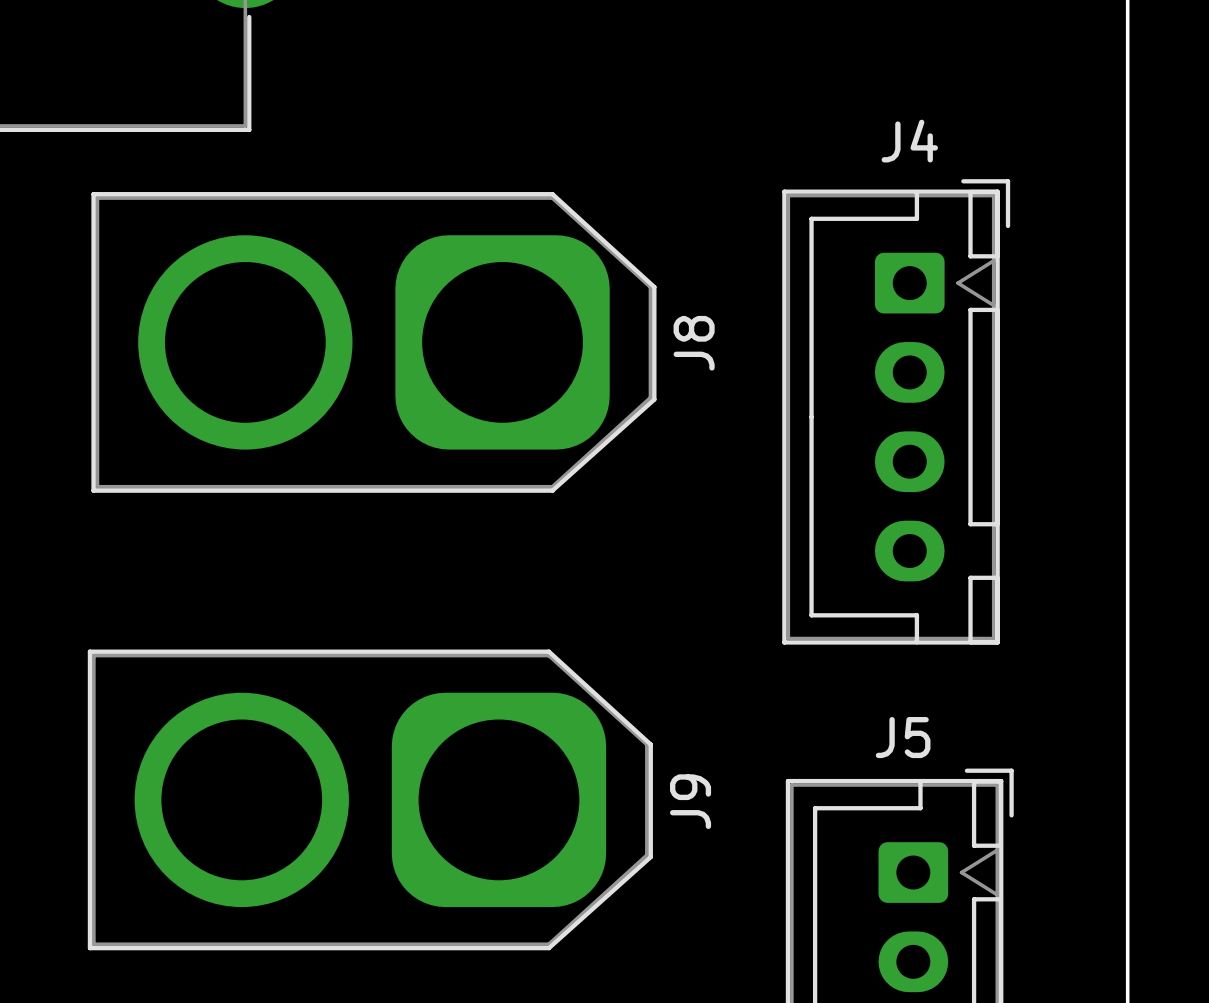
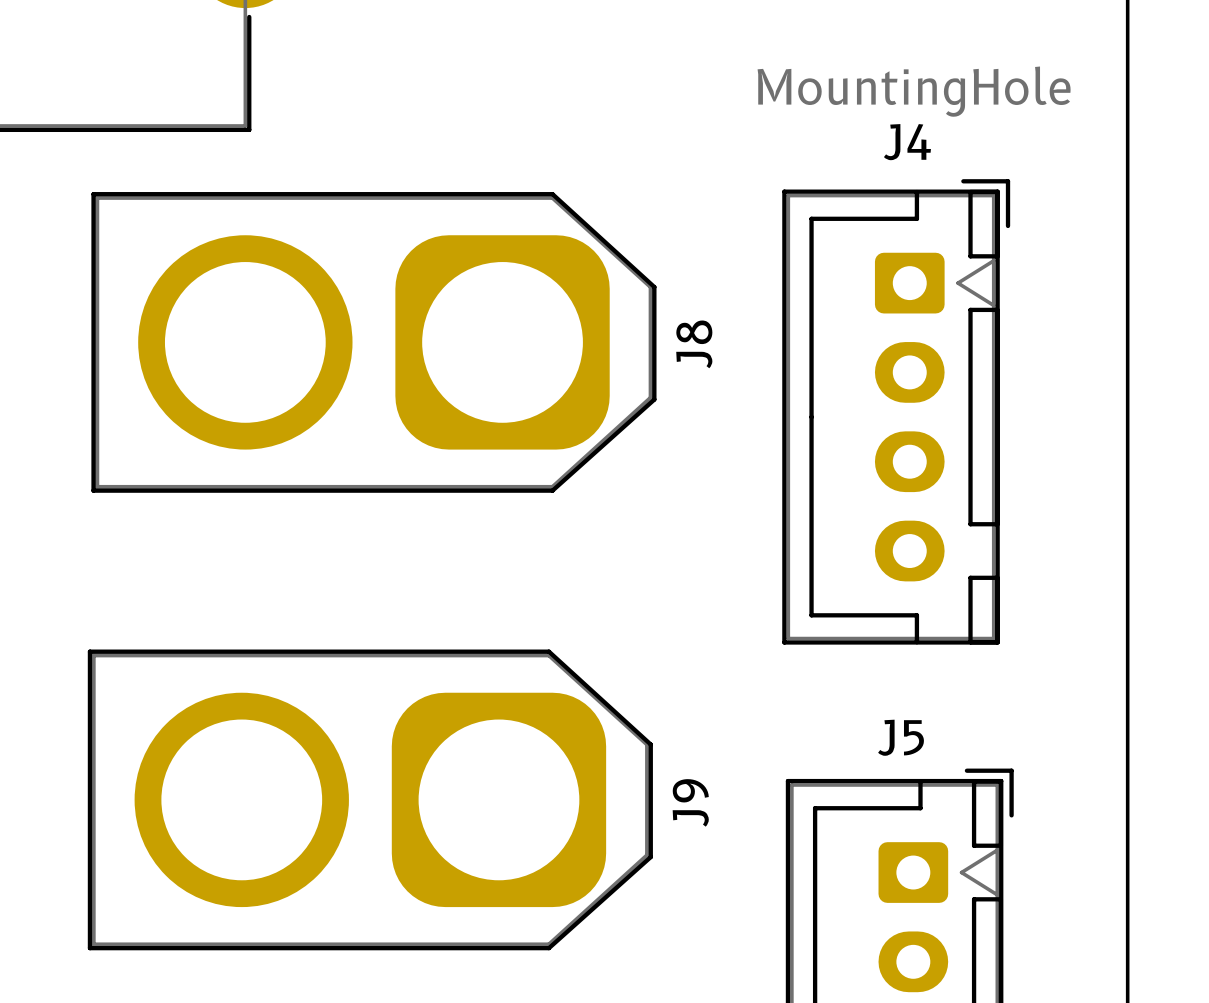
part value: none -> MountingHole (914, 91)

